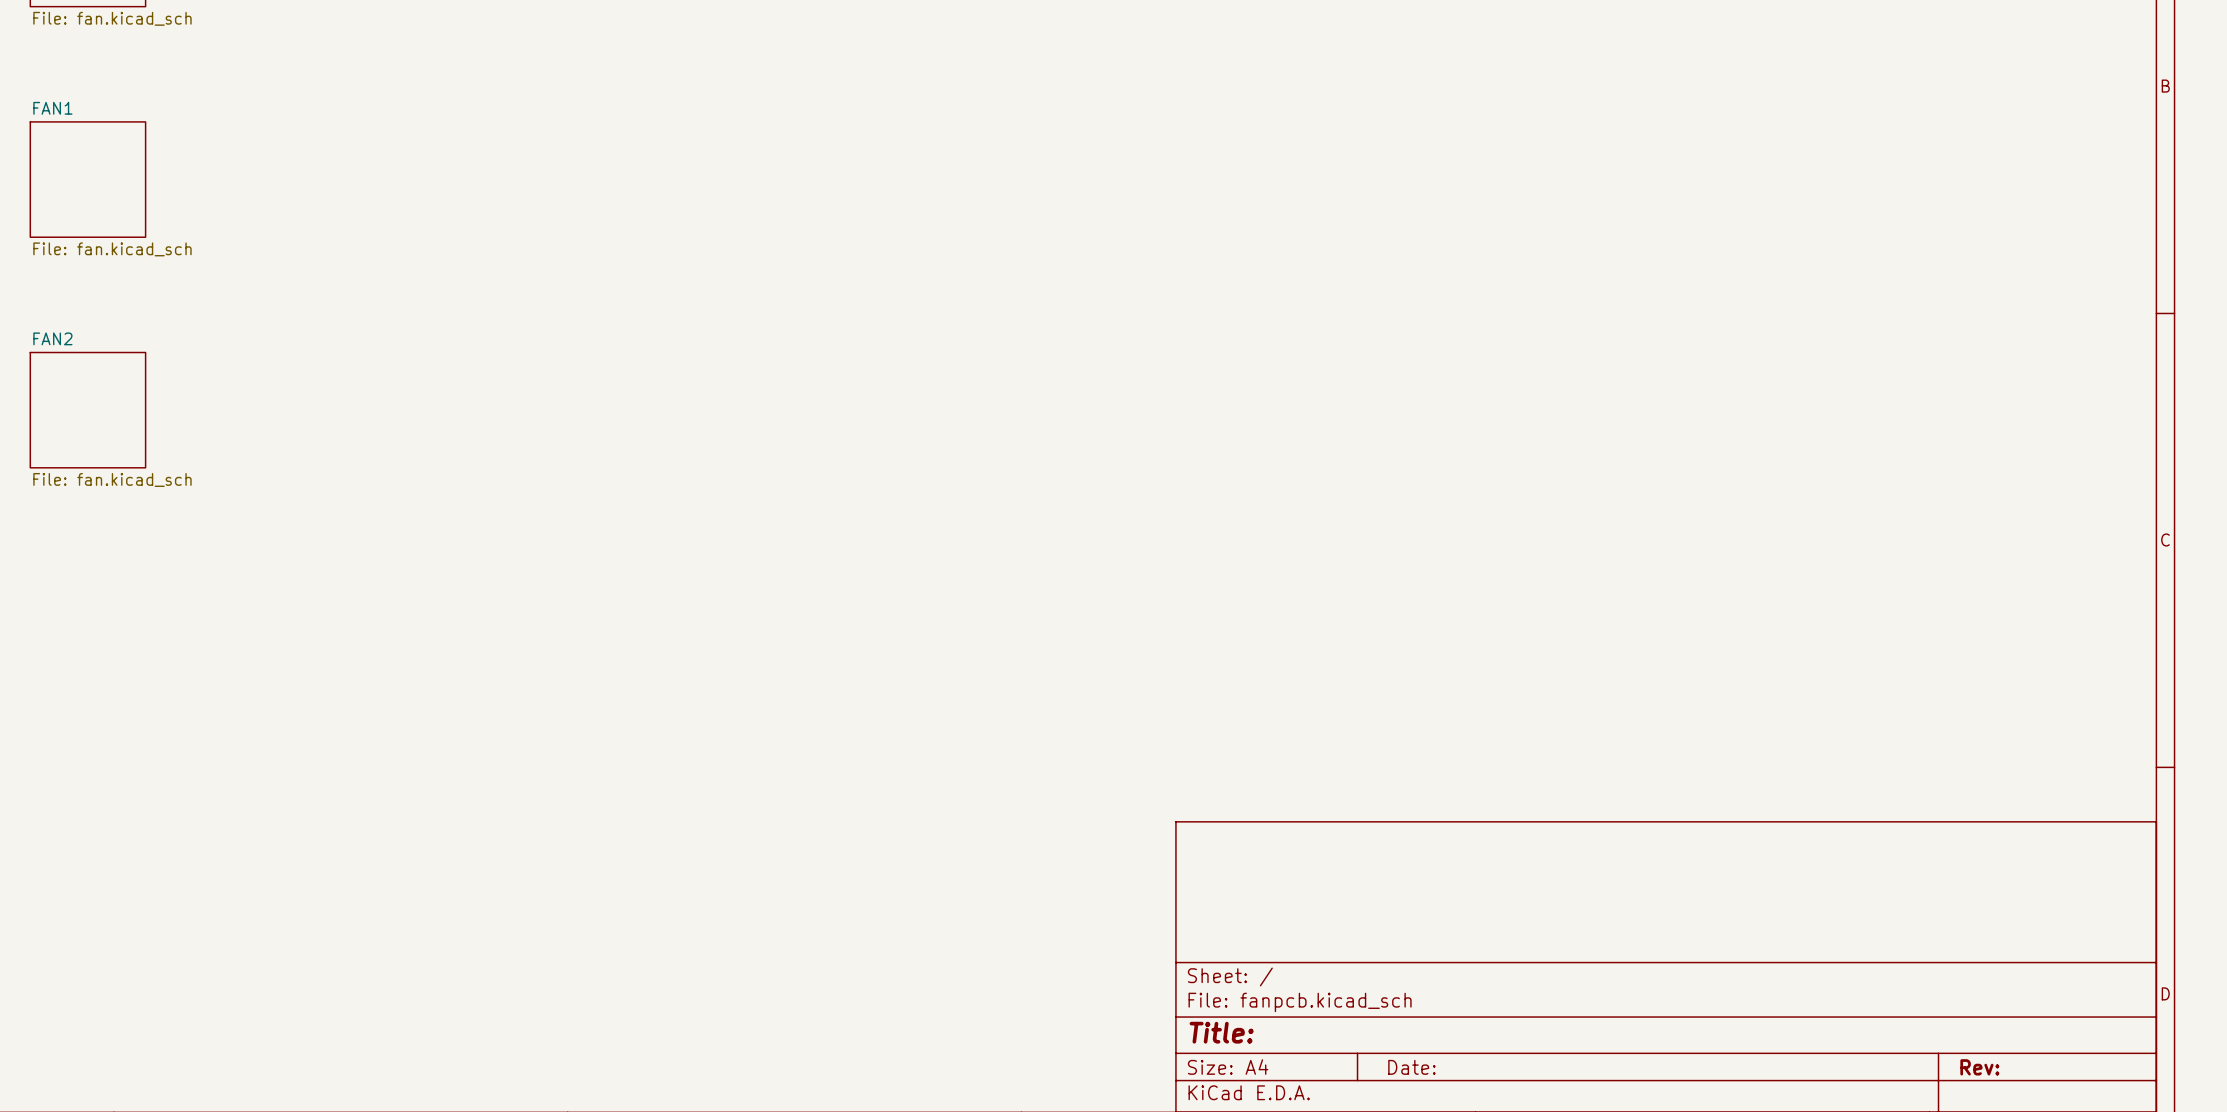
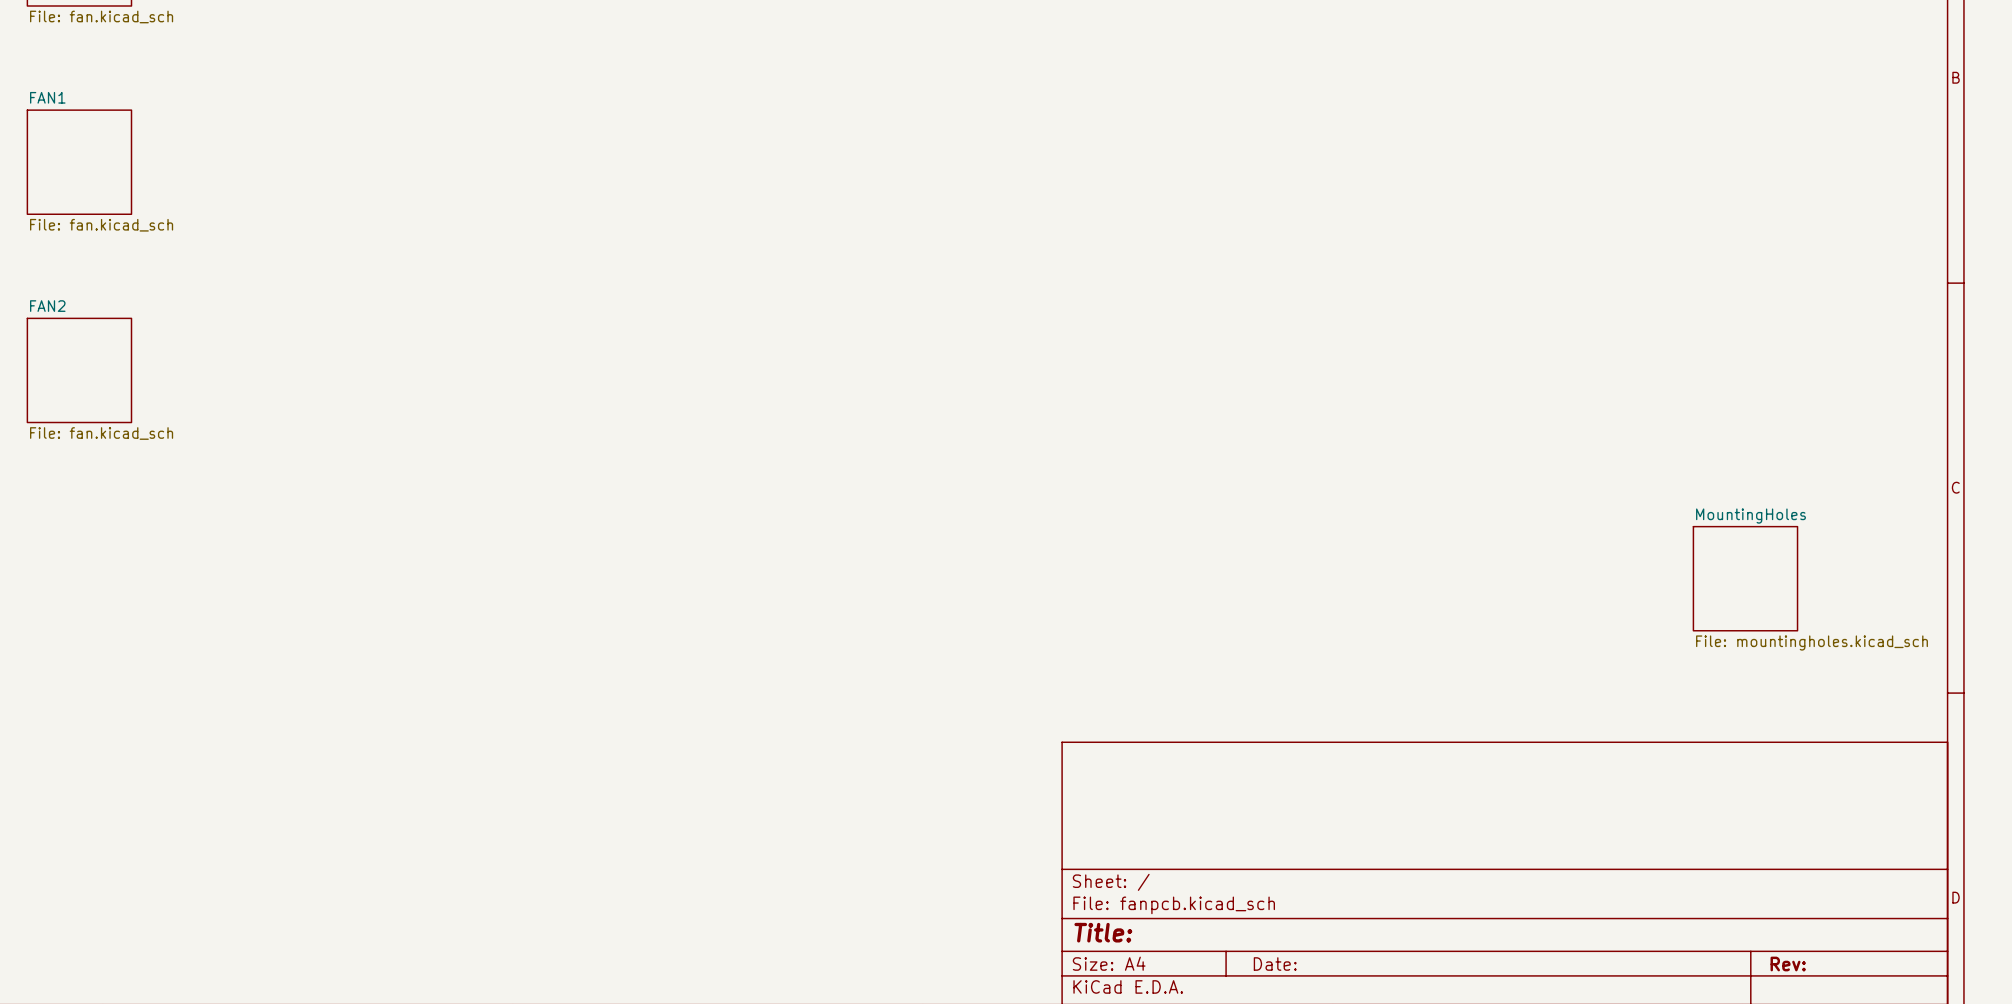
sheet MountingHoles: none -> File: mountingholes.kicad_sch (1745, 578)

